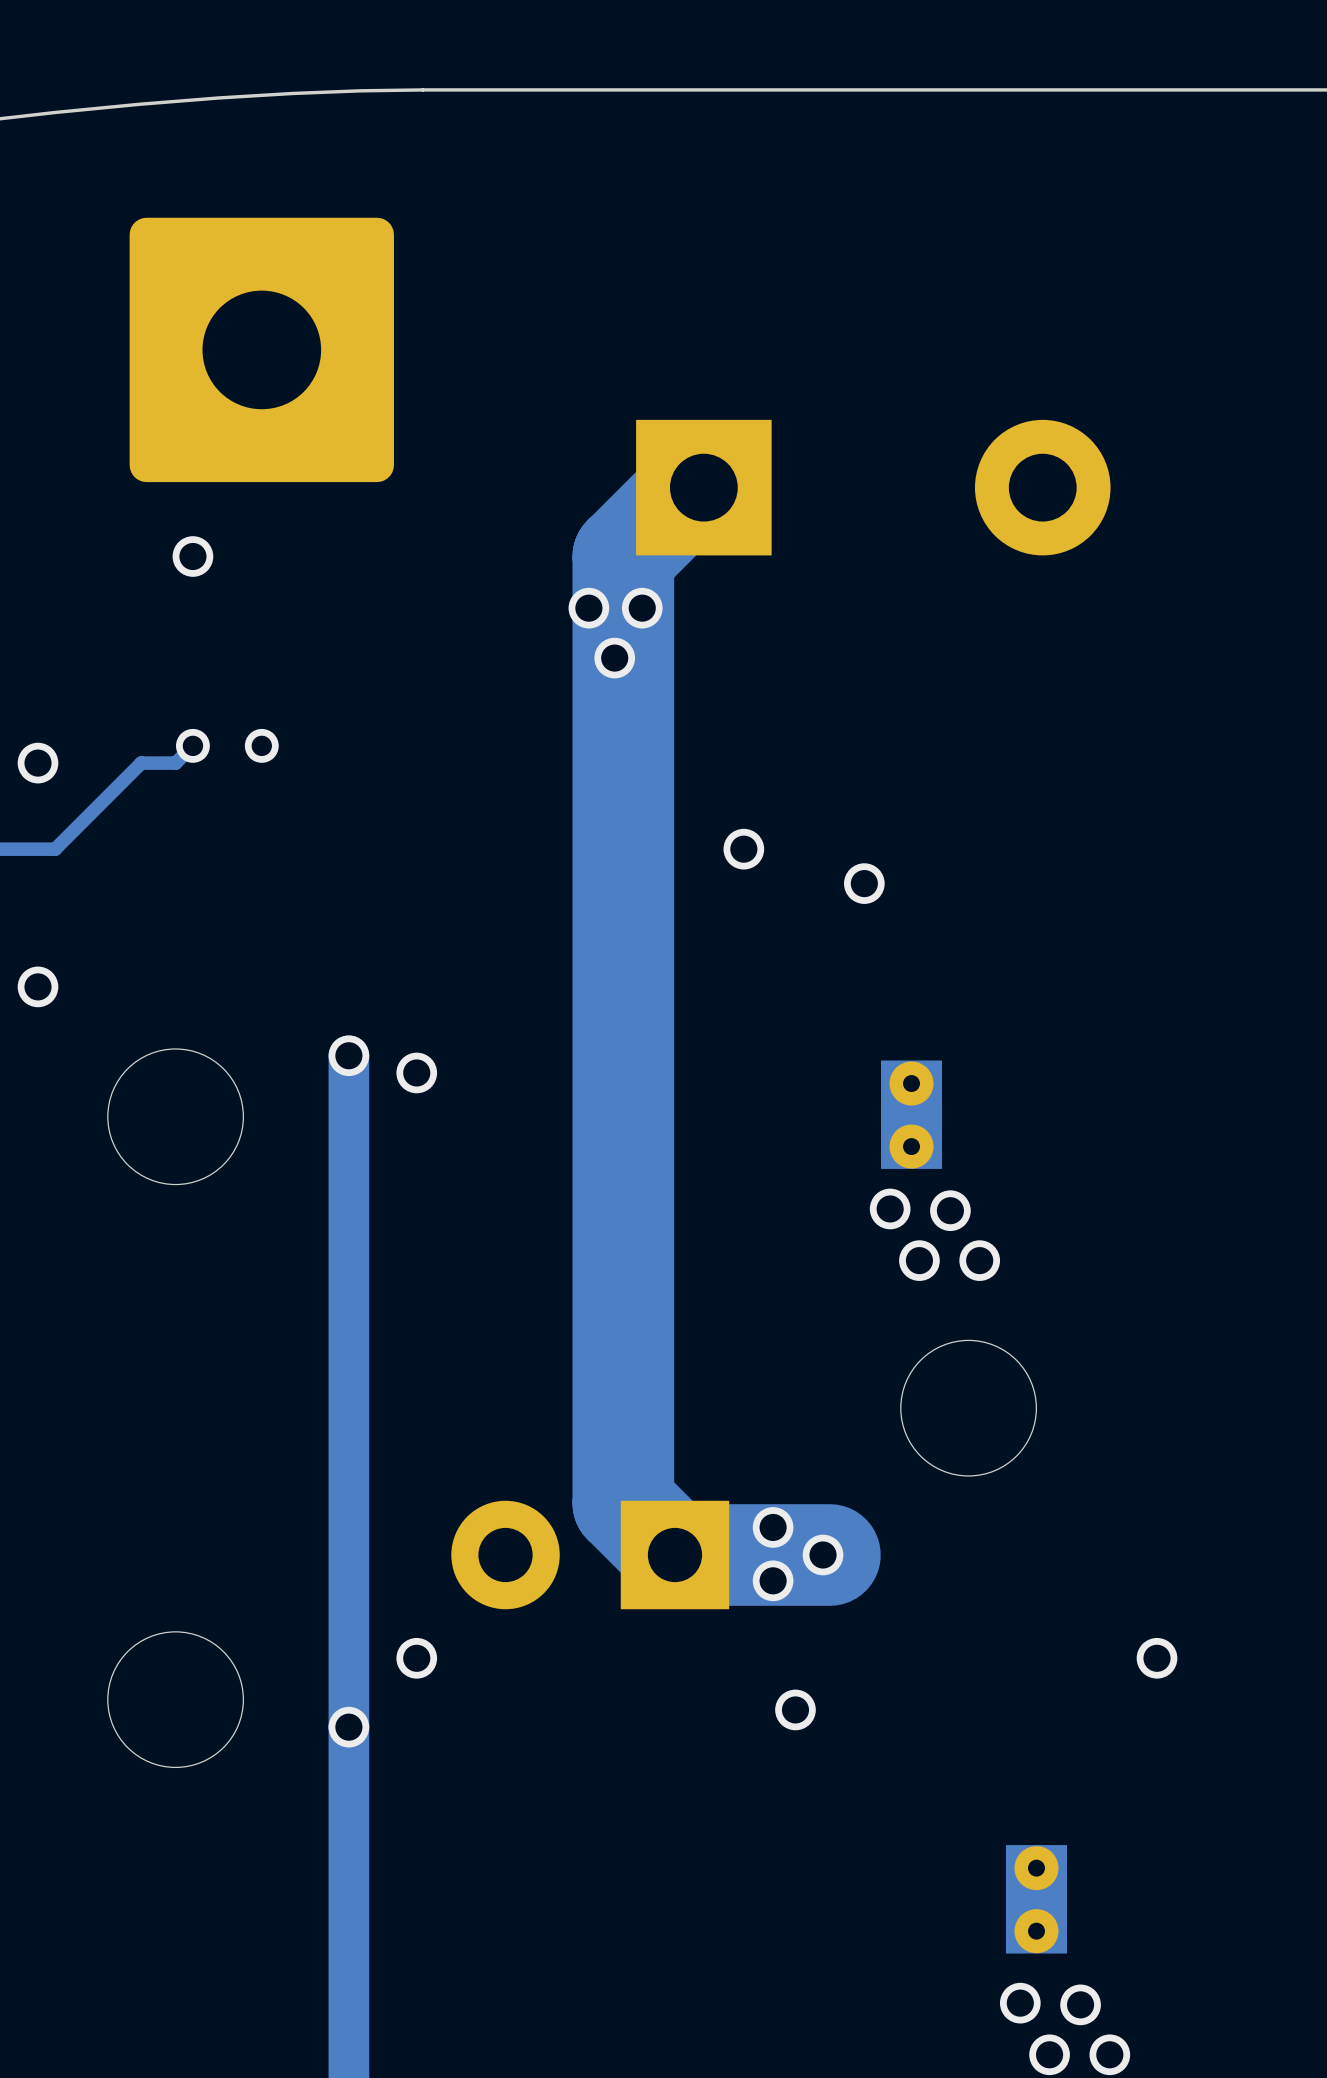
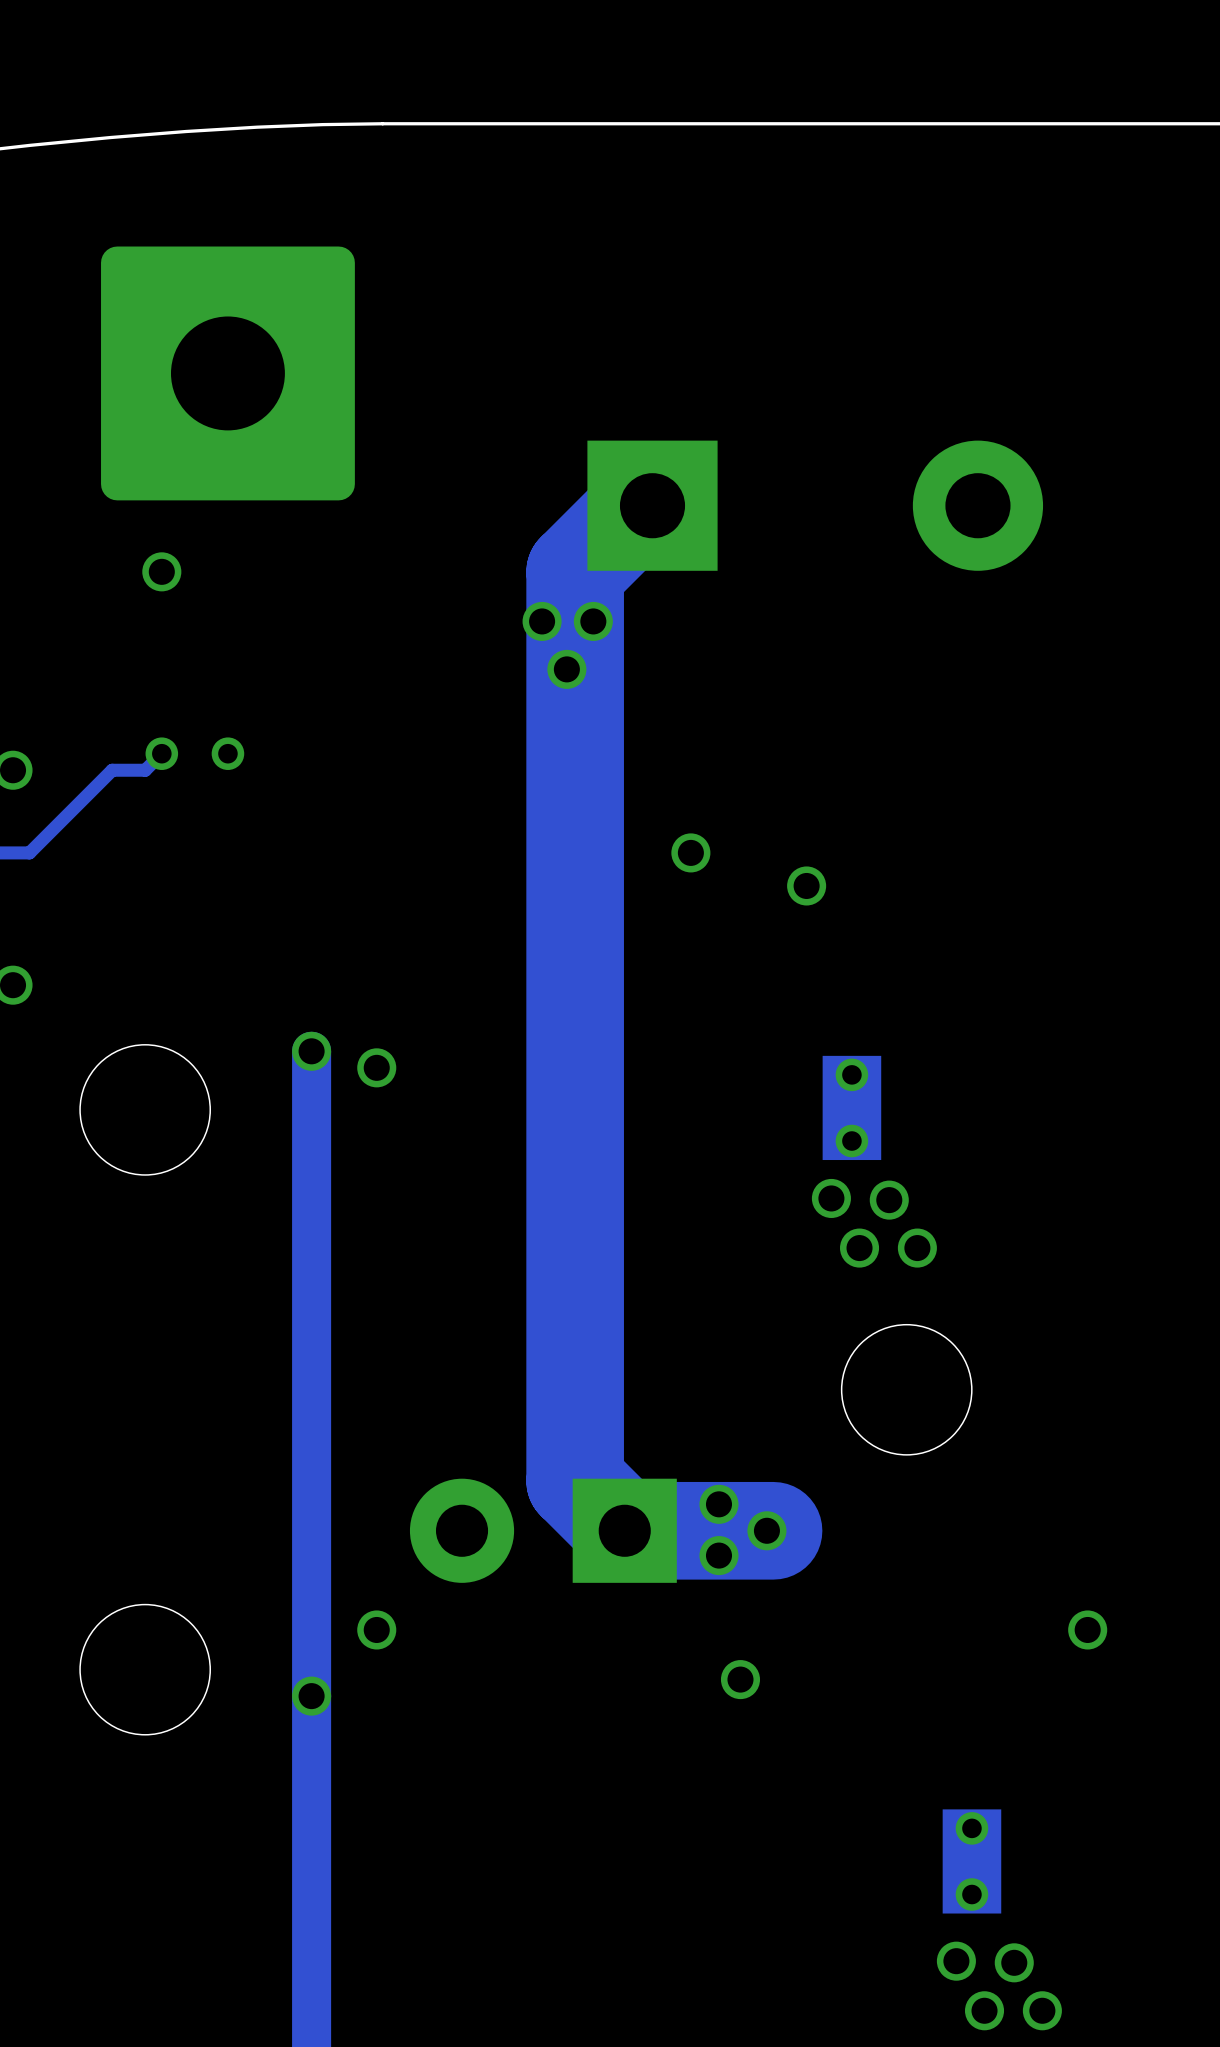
part footprint: [881, 1060, 943, 1169] -> [822, 1055, 882, 1161]
part footprint: [1006, 1845, 1068, 1954] -> [942, 1809, 1002, 1914]

